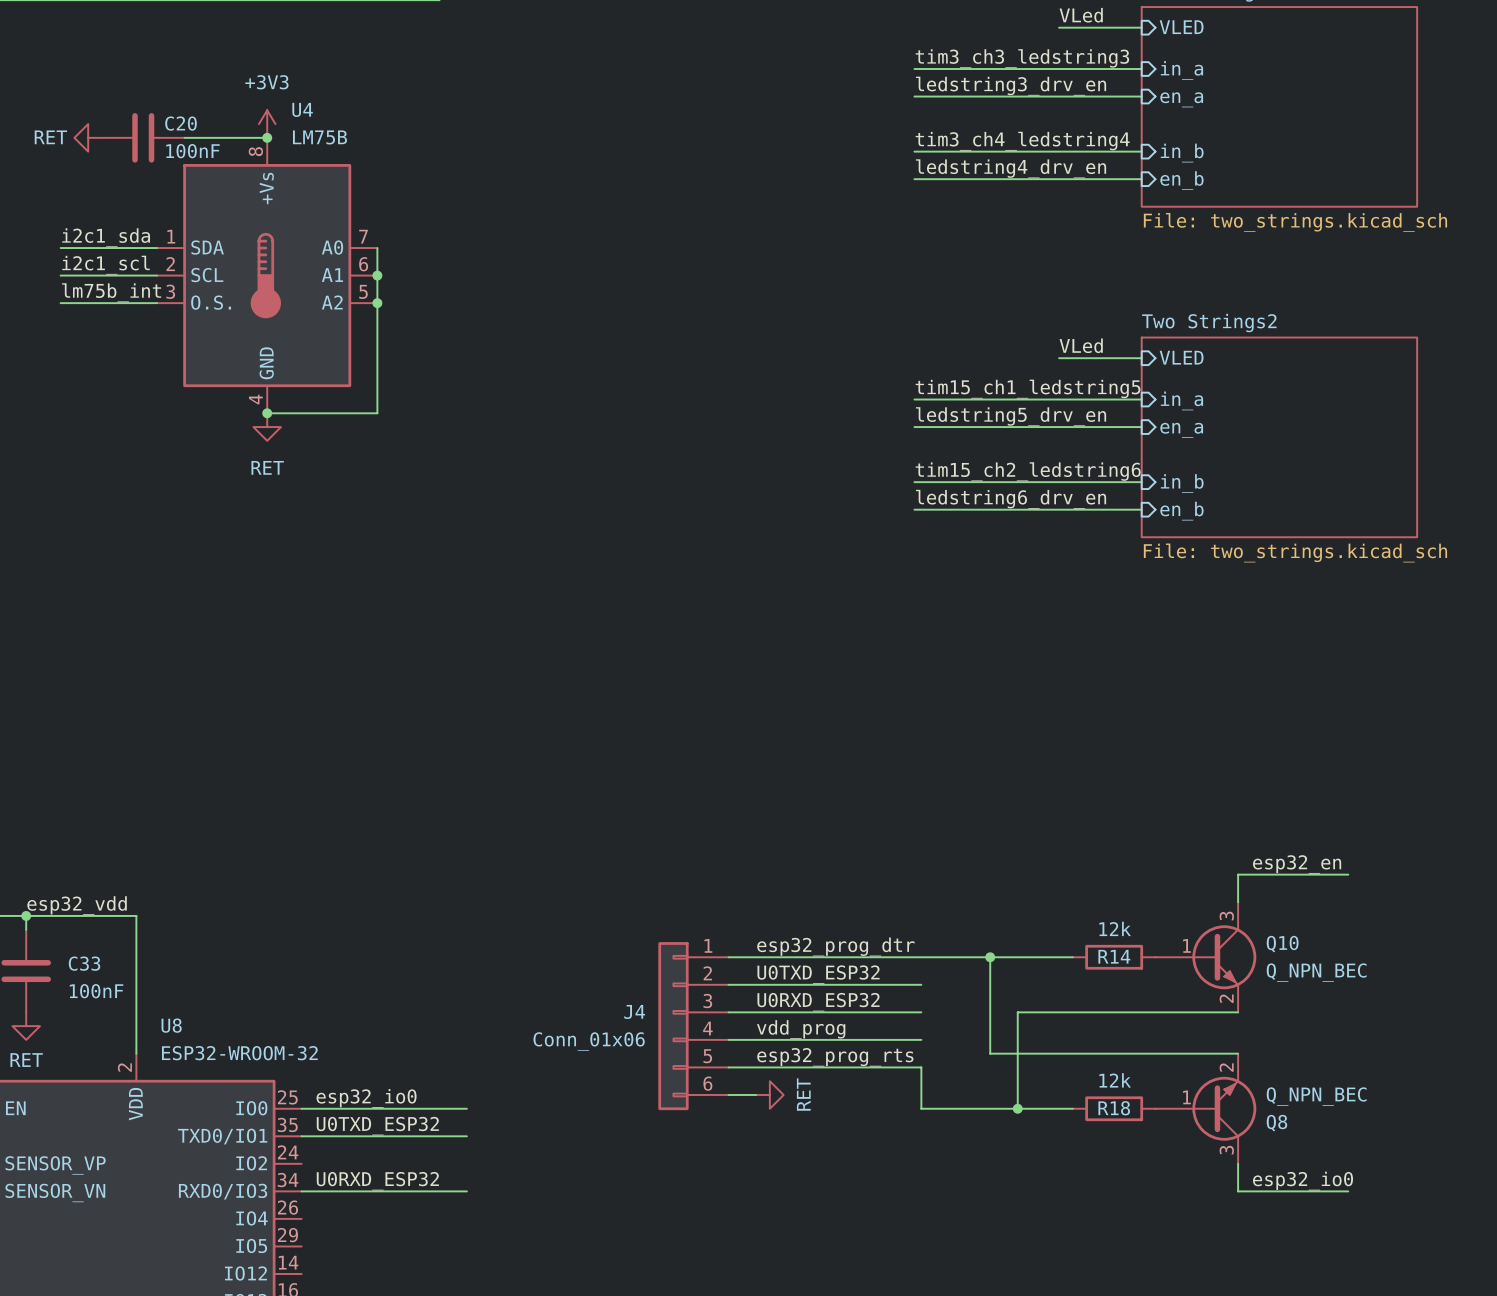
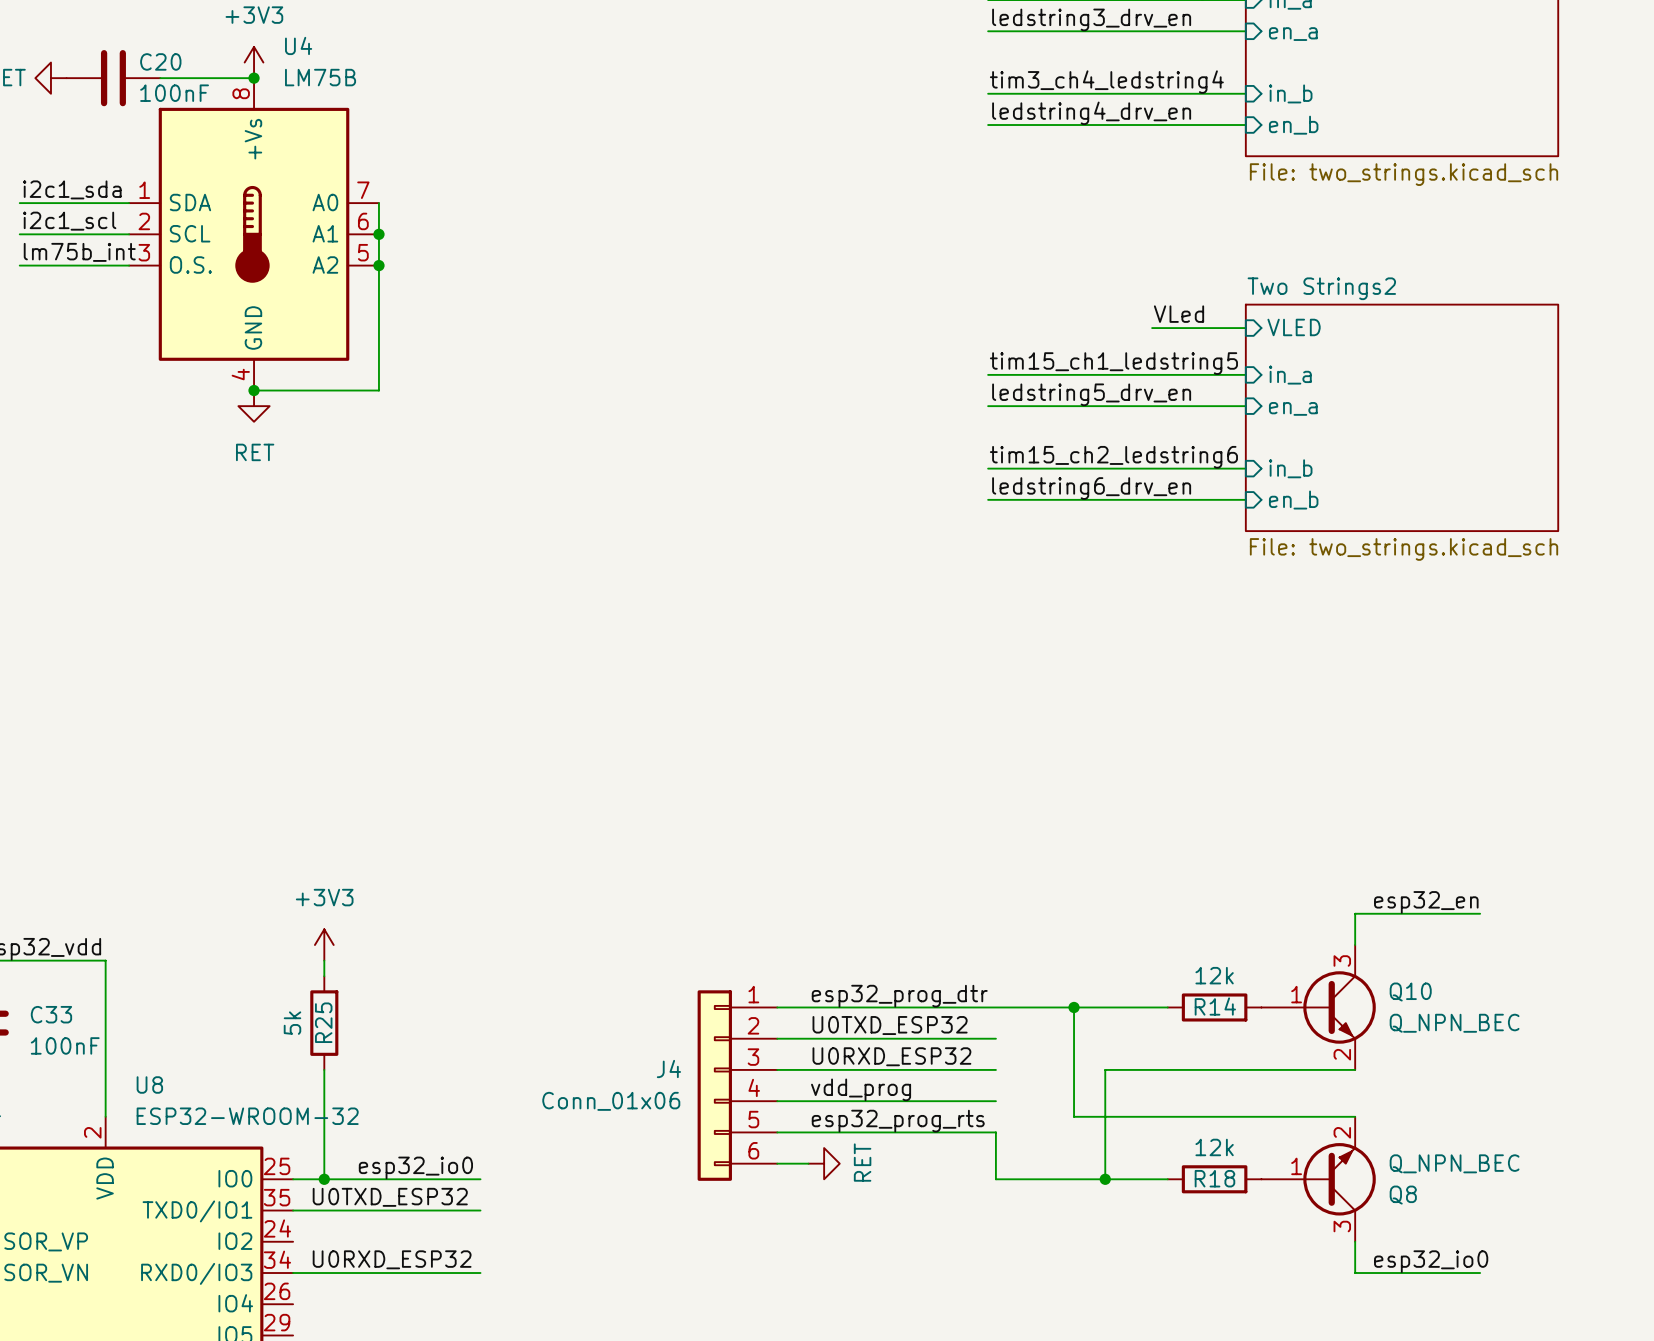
power symbol: none -> +3V3 (324, 945)
wire: none -> (324, 960) (324, 976)
R25: none -> 5k (324, 1023)
wire: none -> (324, 1069) (324, 1179)
label position: esp32_io0 (366, 1098) -> esp32_io0 (415, 1167)
junction: none -> (324, 1179)

